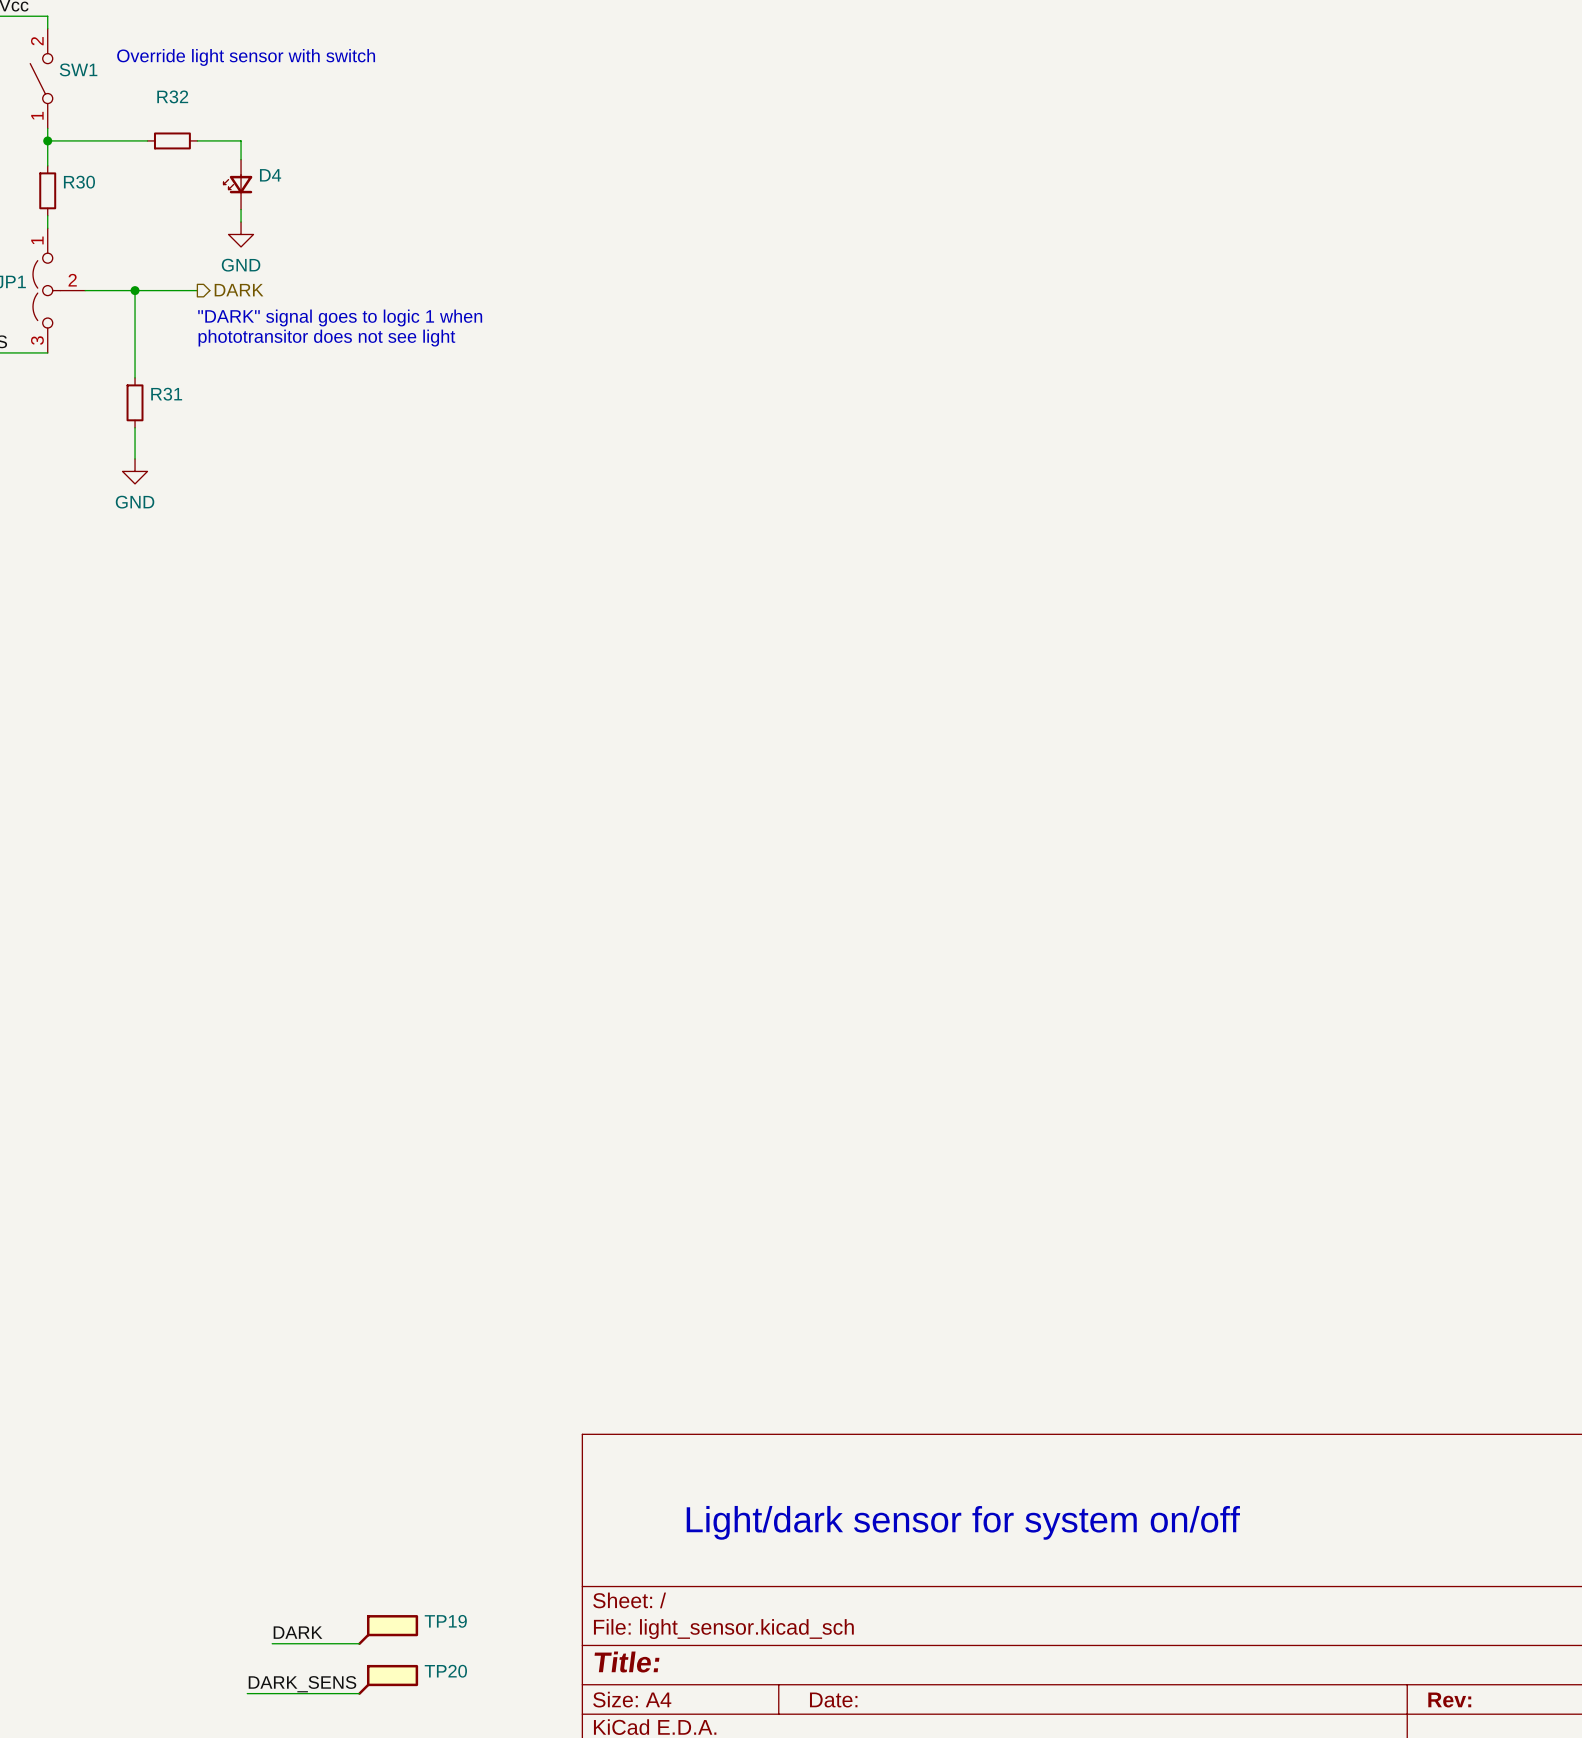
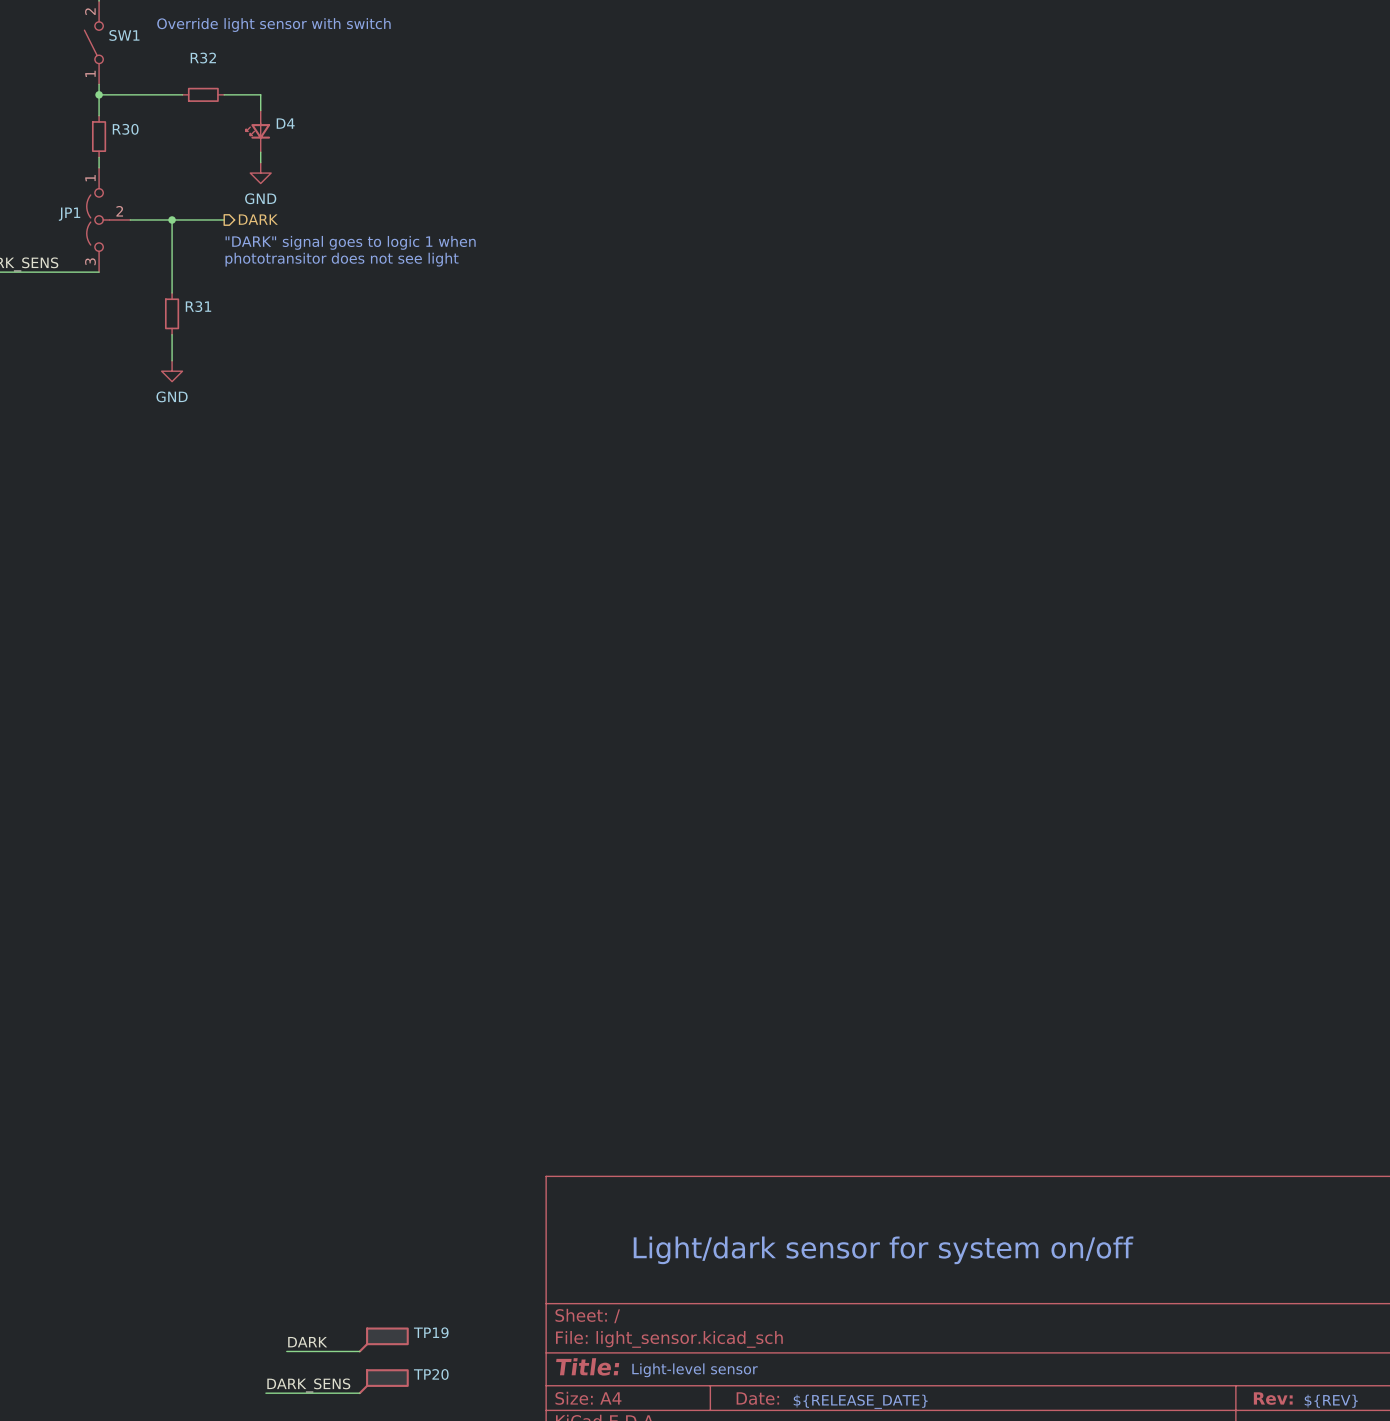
text: none -> Light-level sensor (695, 1370)
text: none -> ${RELEASE_DATE} (860, 1401)
text: none -> ${REV} (1331, 1401)

